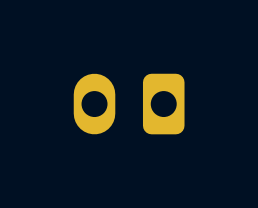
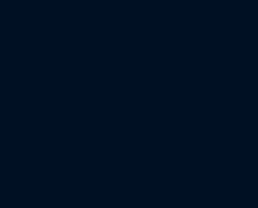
part: (129, 104) -> none

